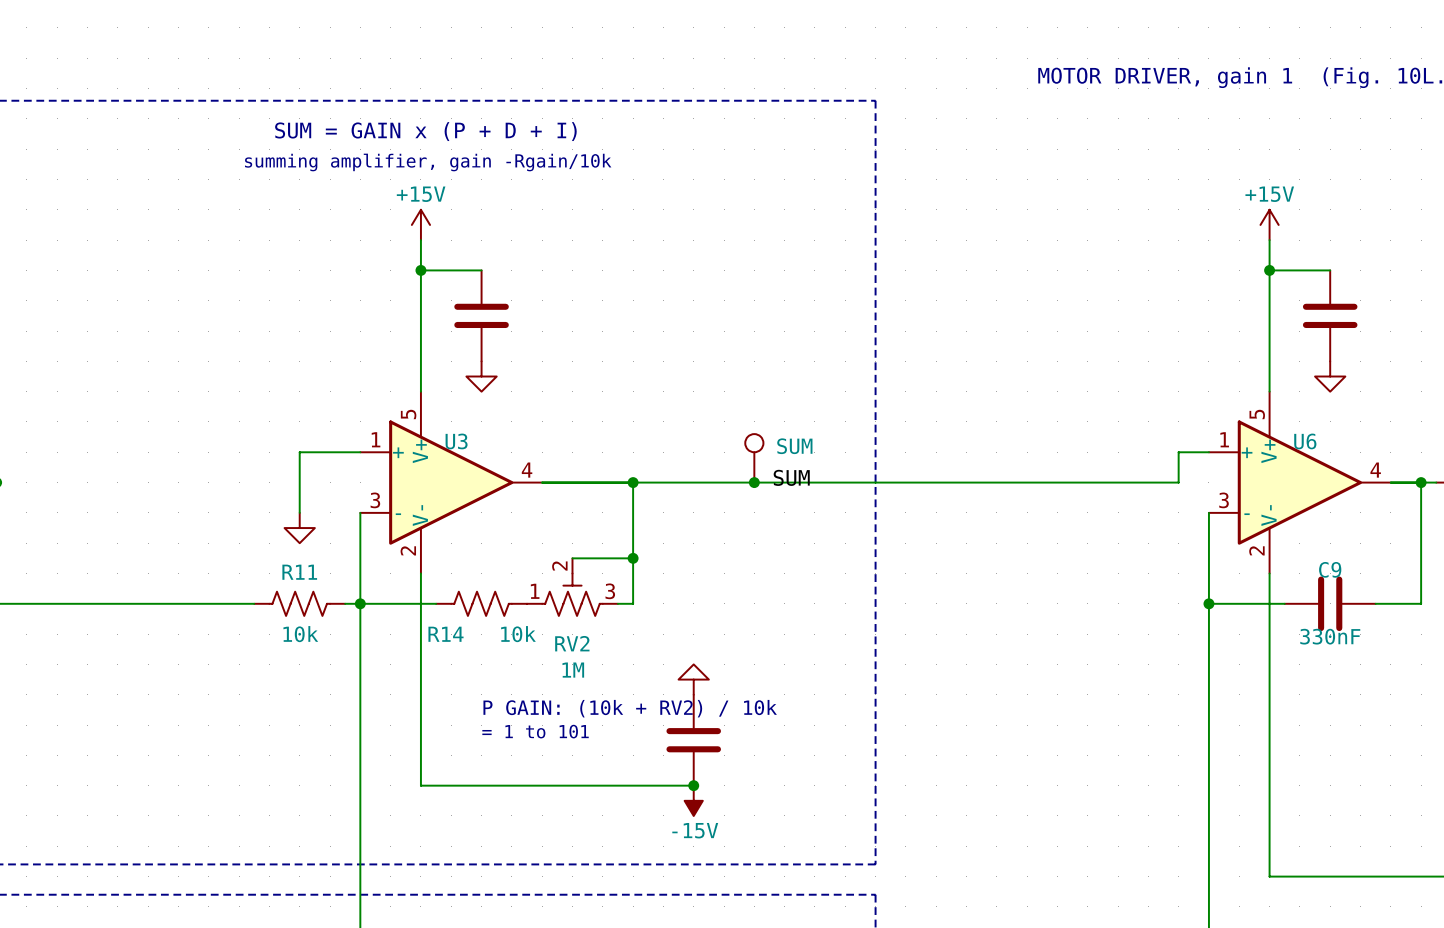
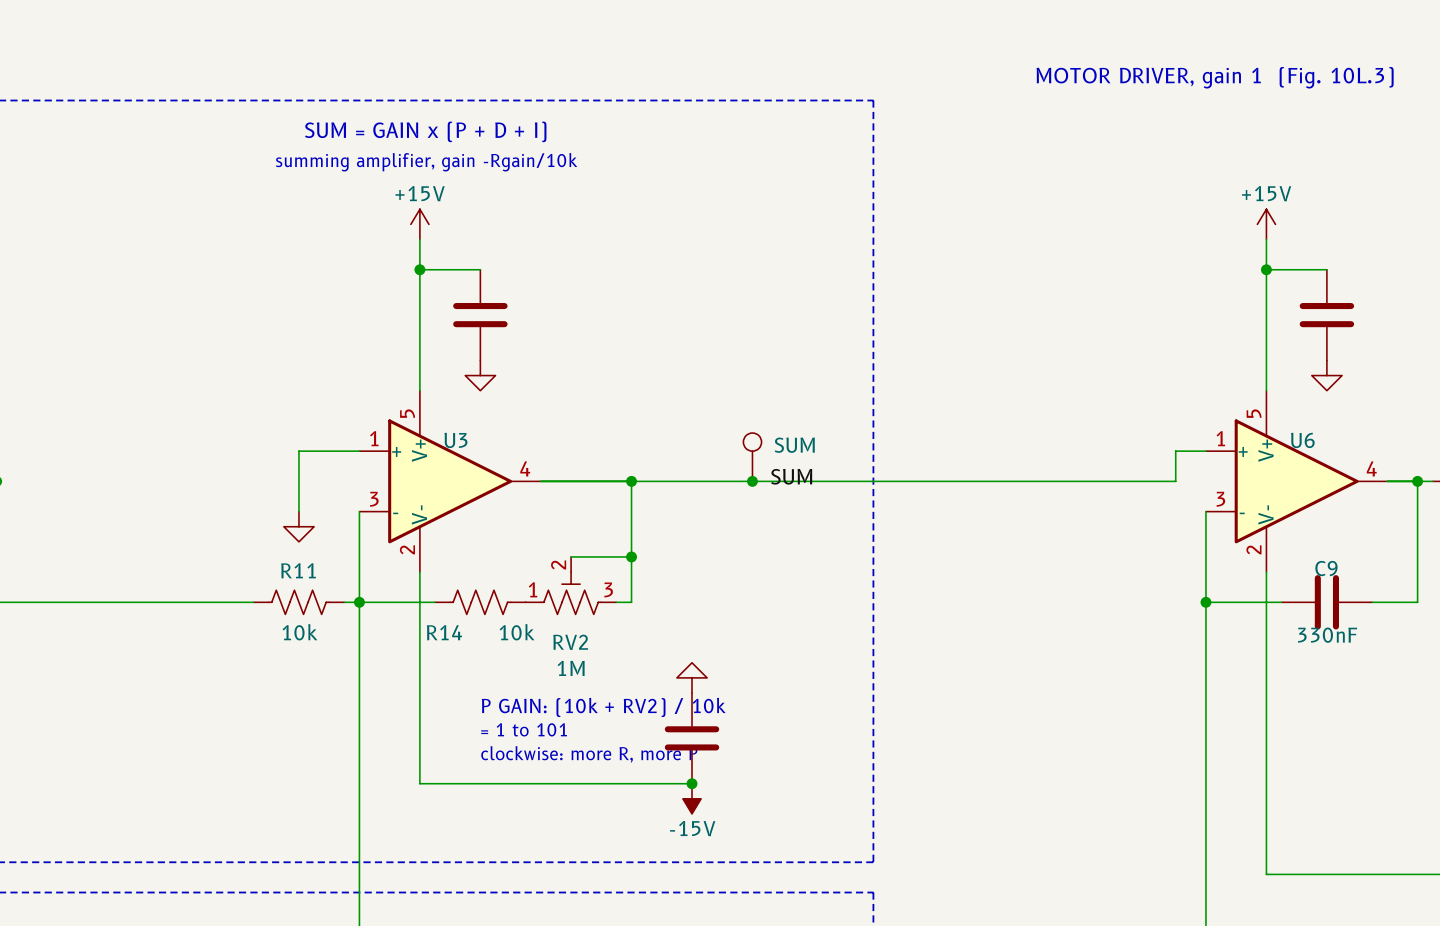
text: none -> clockwise: more R, more P (589, 754)

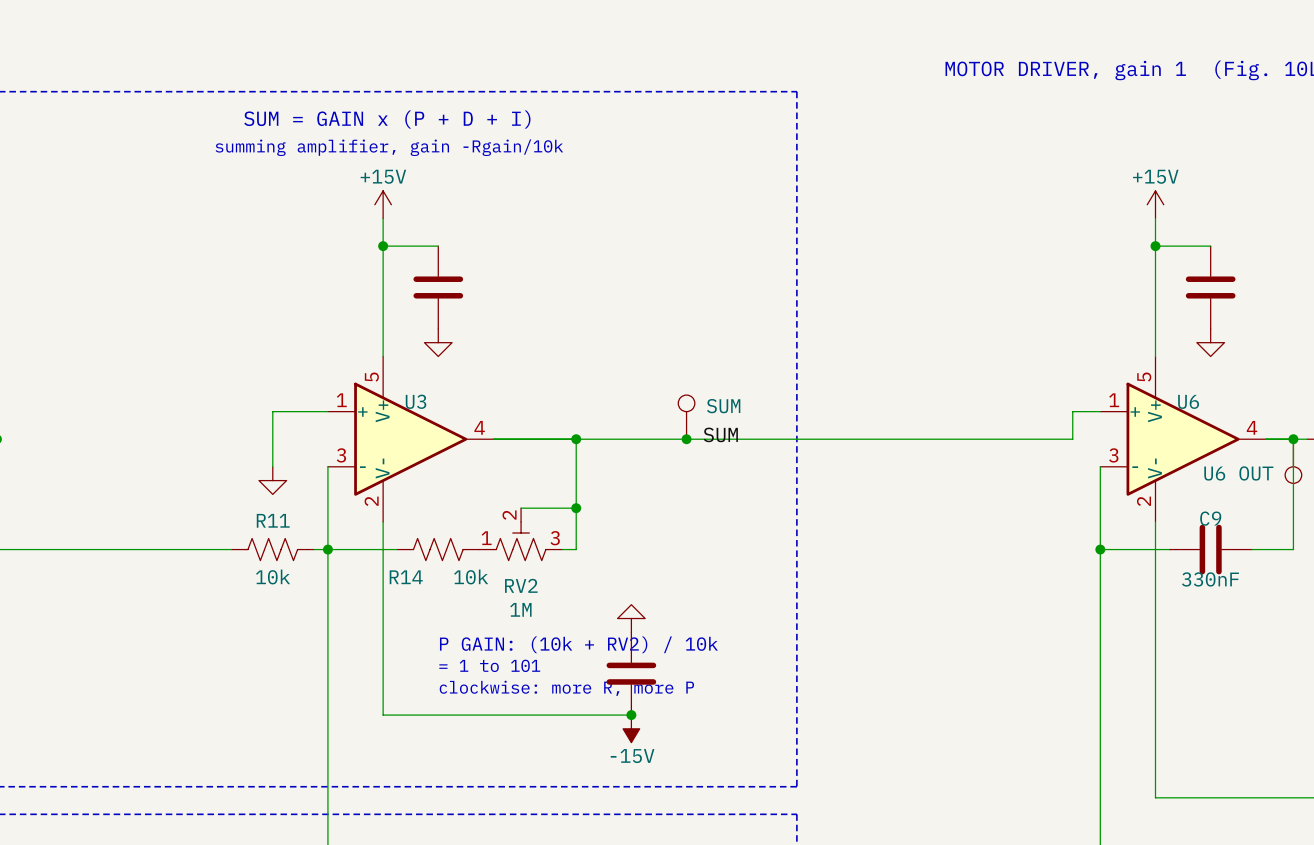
part: none -> U6 OUT (1293, 461)

